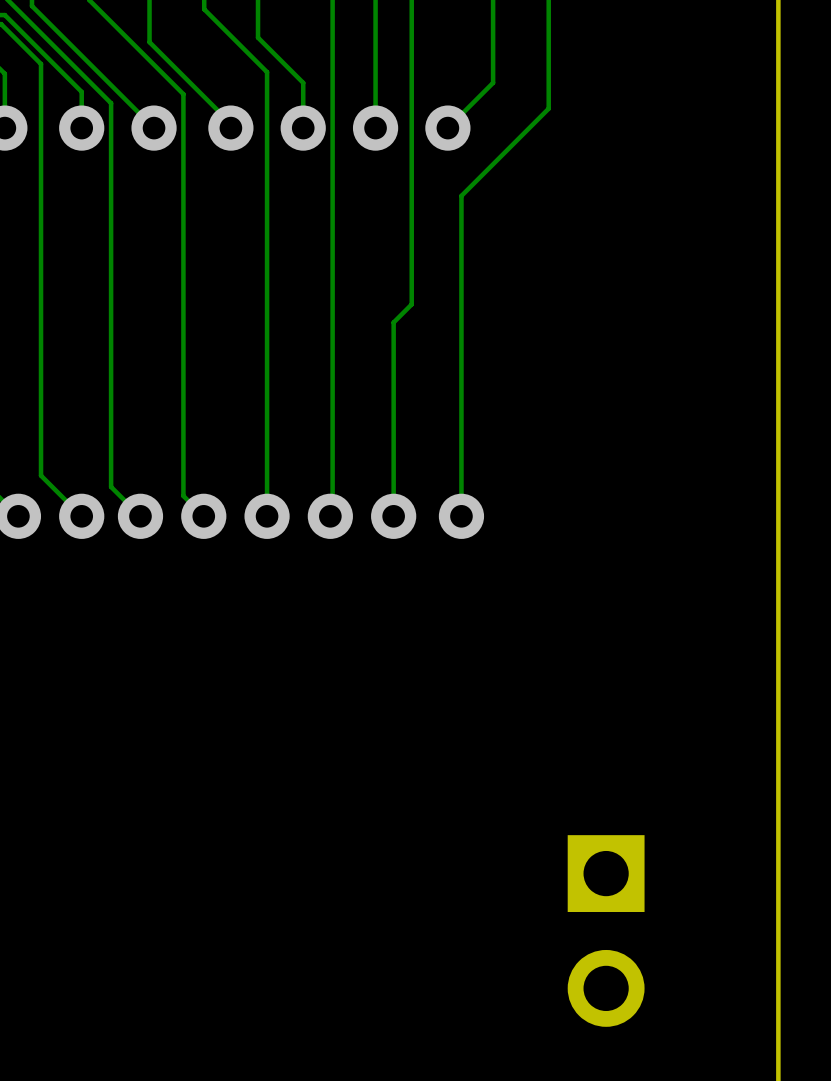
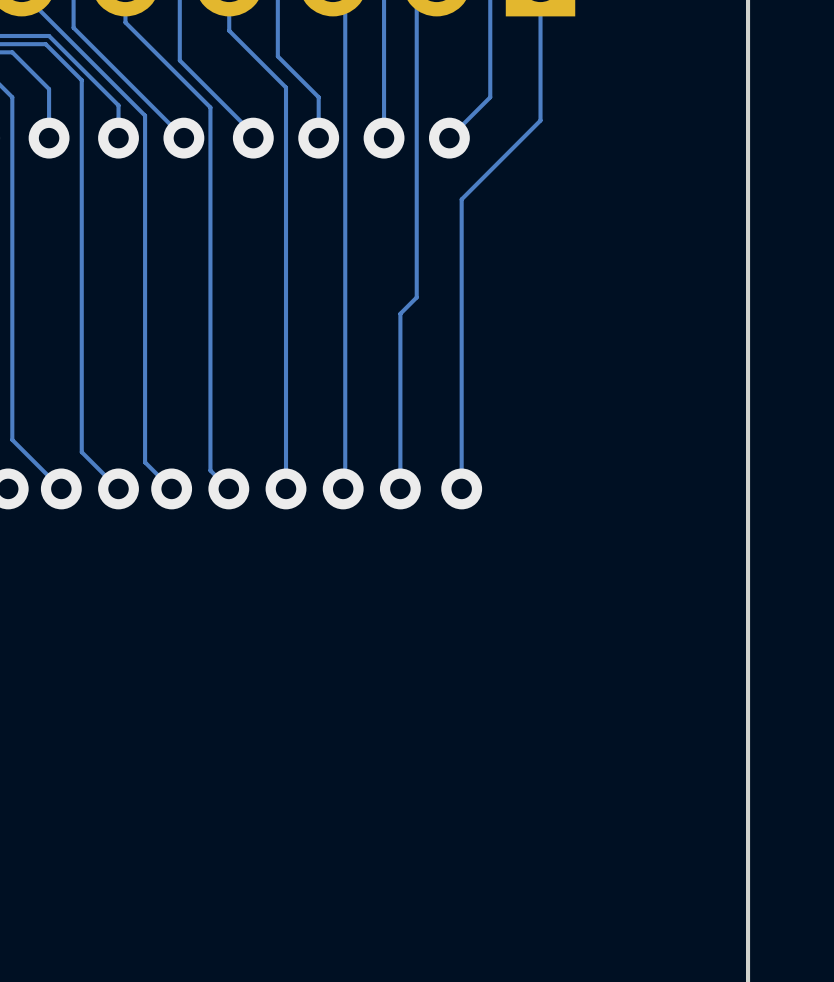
part: (606, 930) -> none

